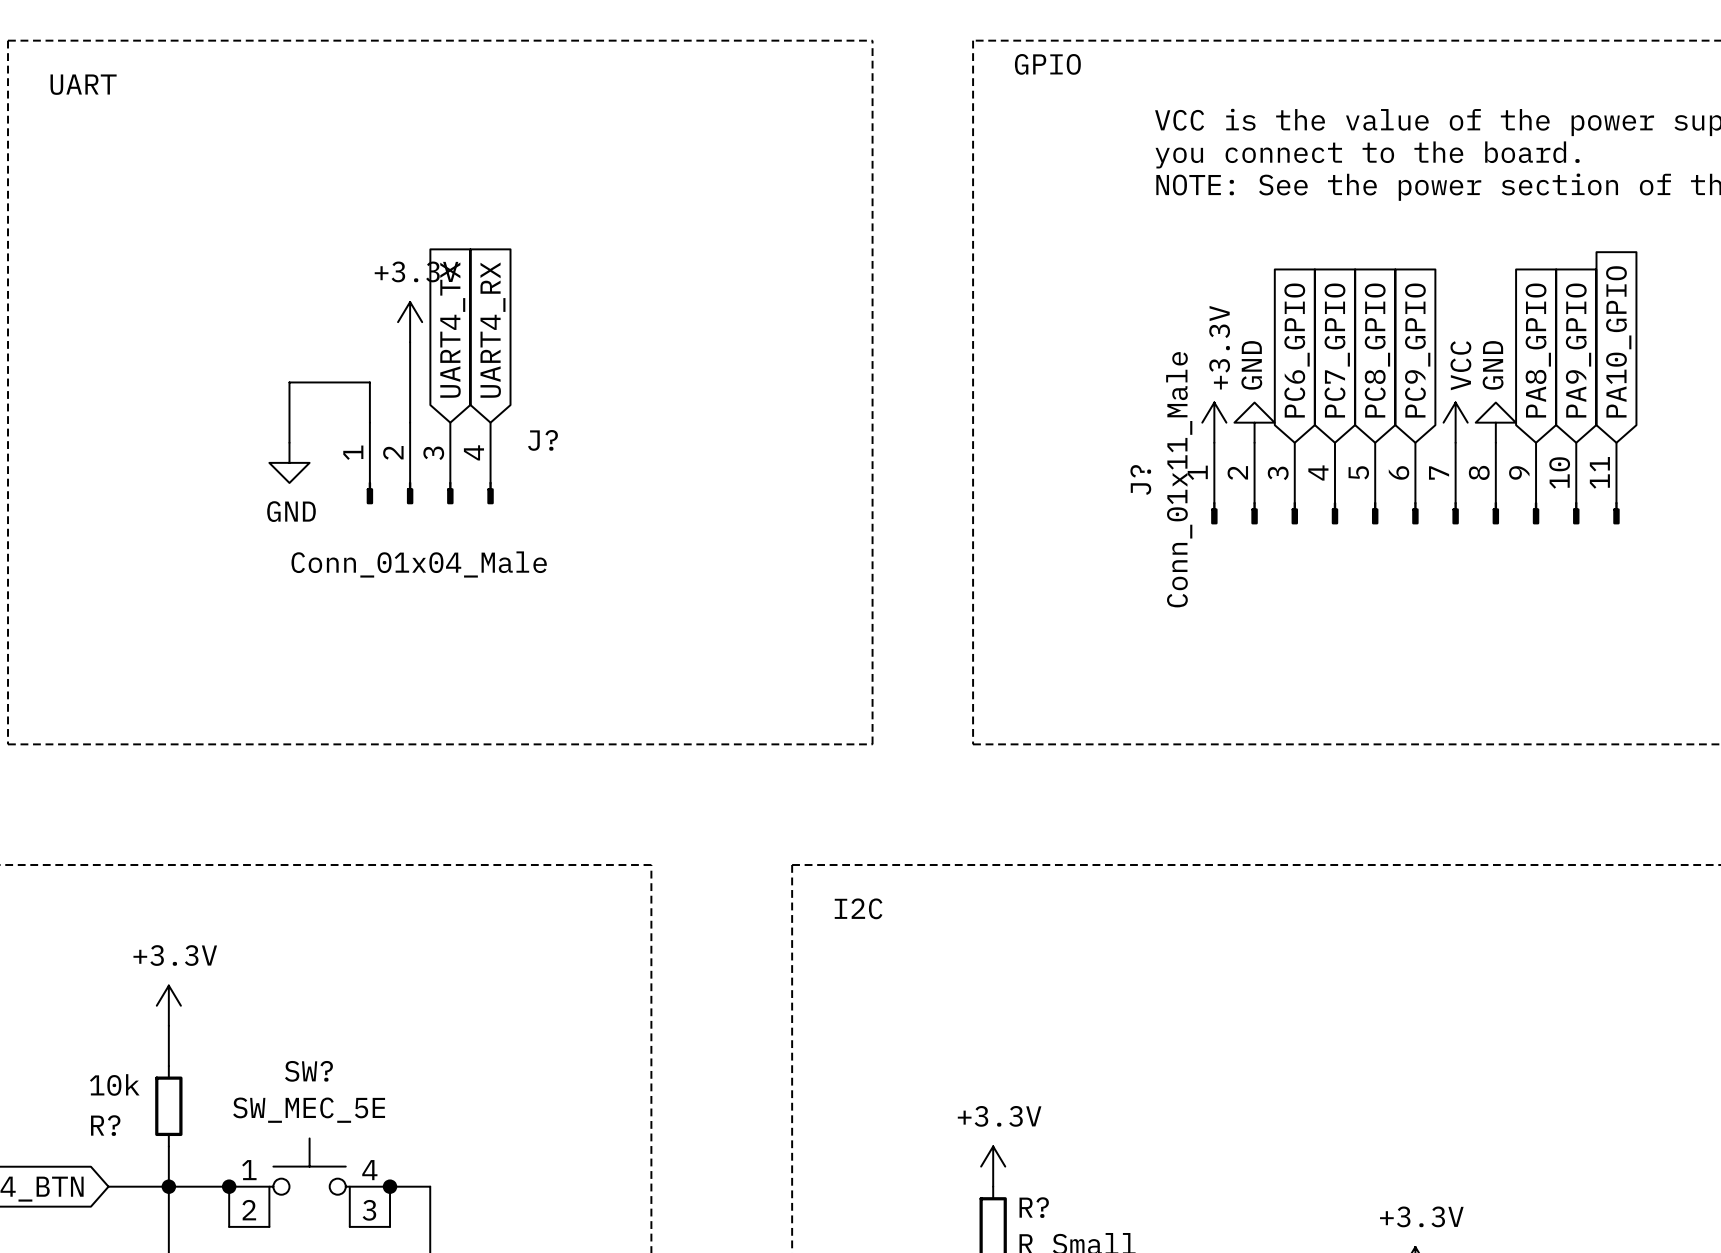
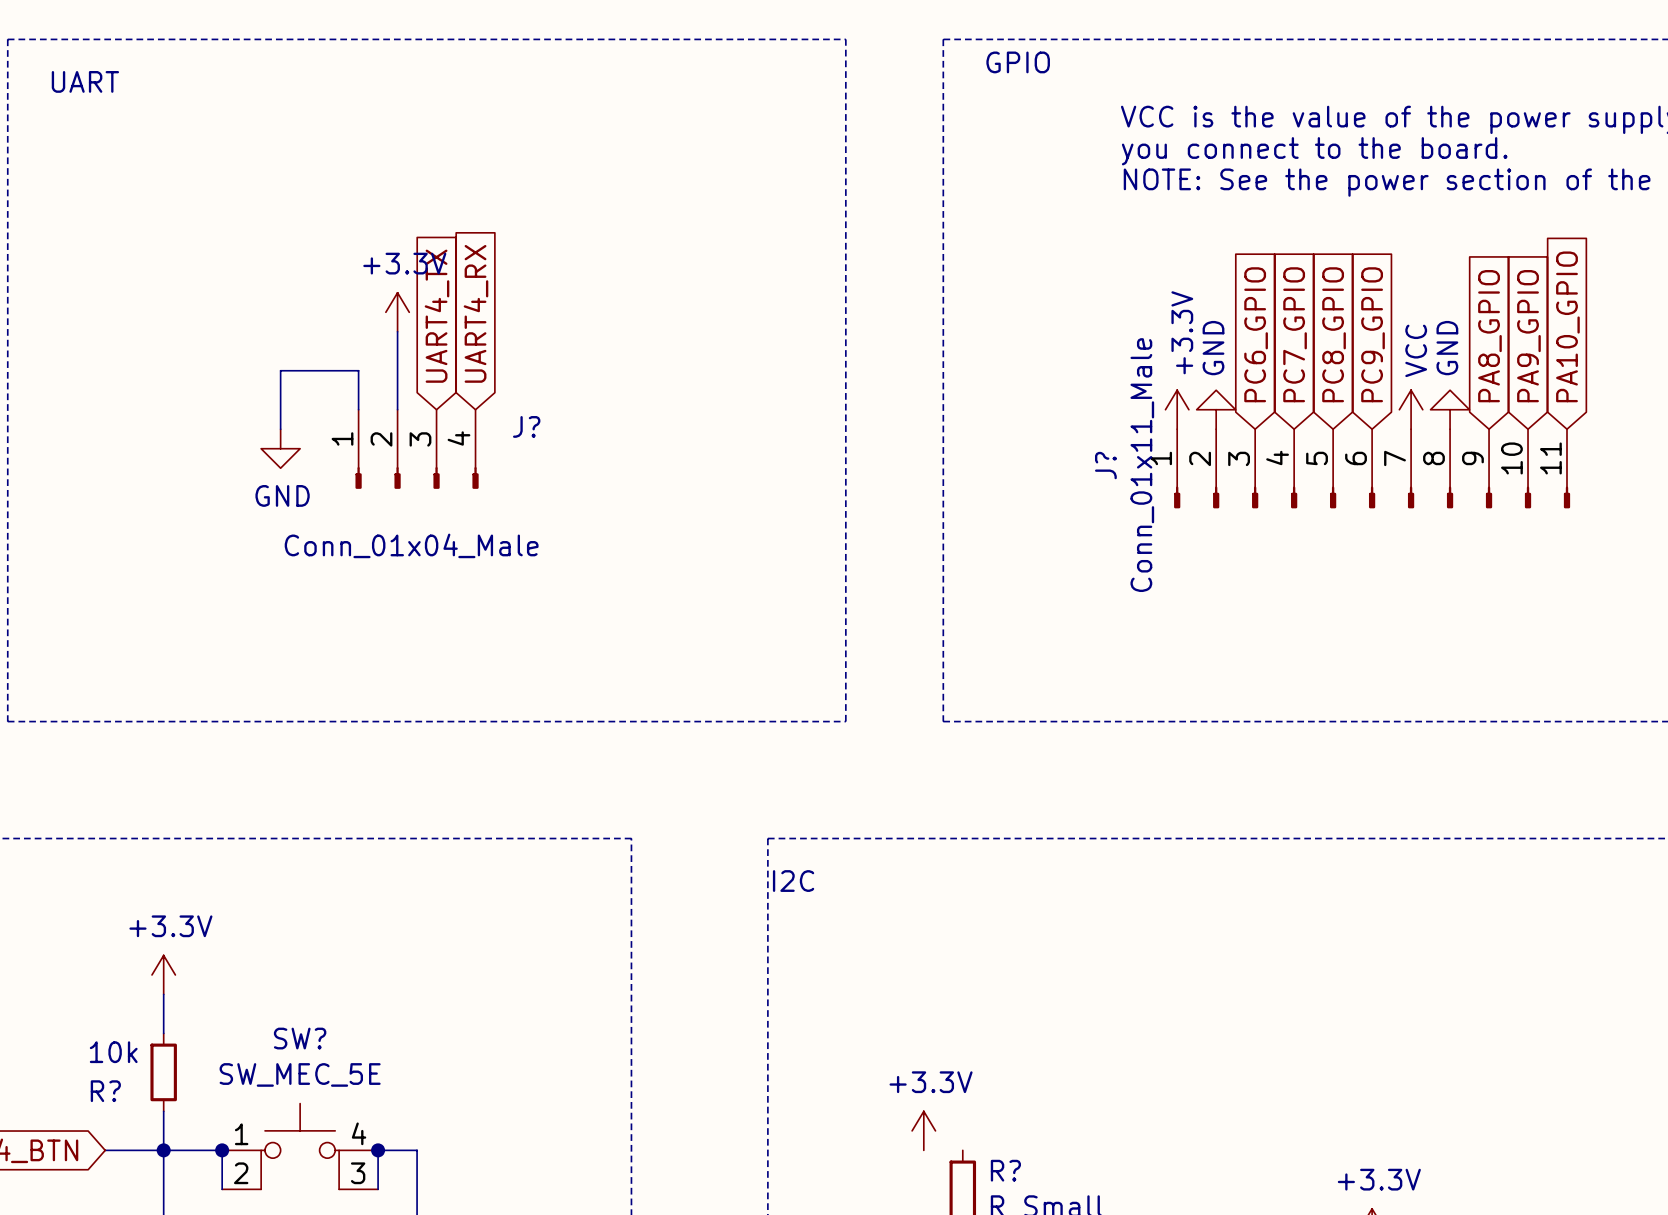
text position: I2C (858, 908) -> I2C (793, 881)
power symbol position: +3.3V (993, 1166) -> +3.3V (923, 1130)

